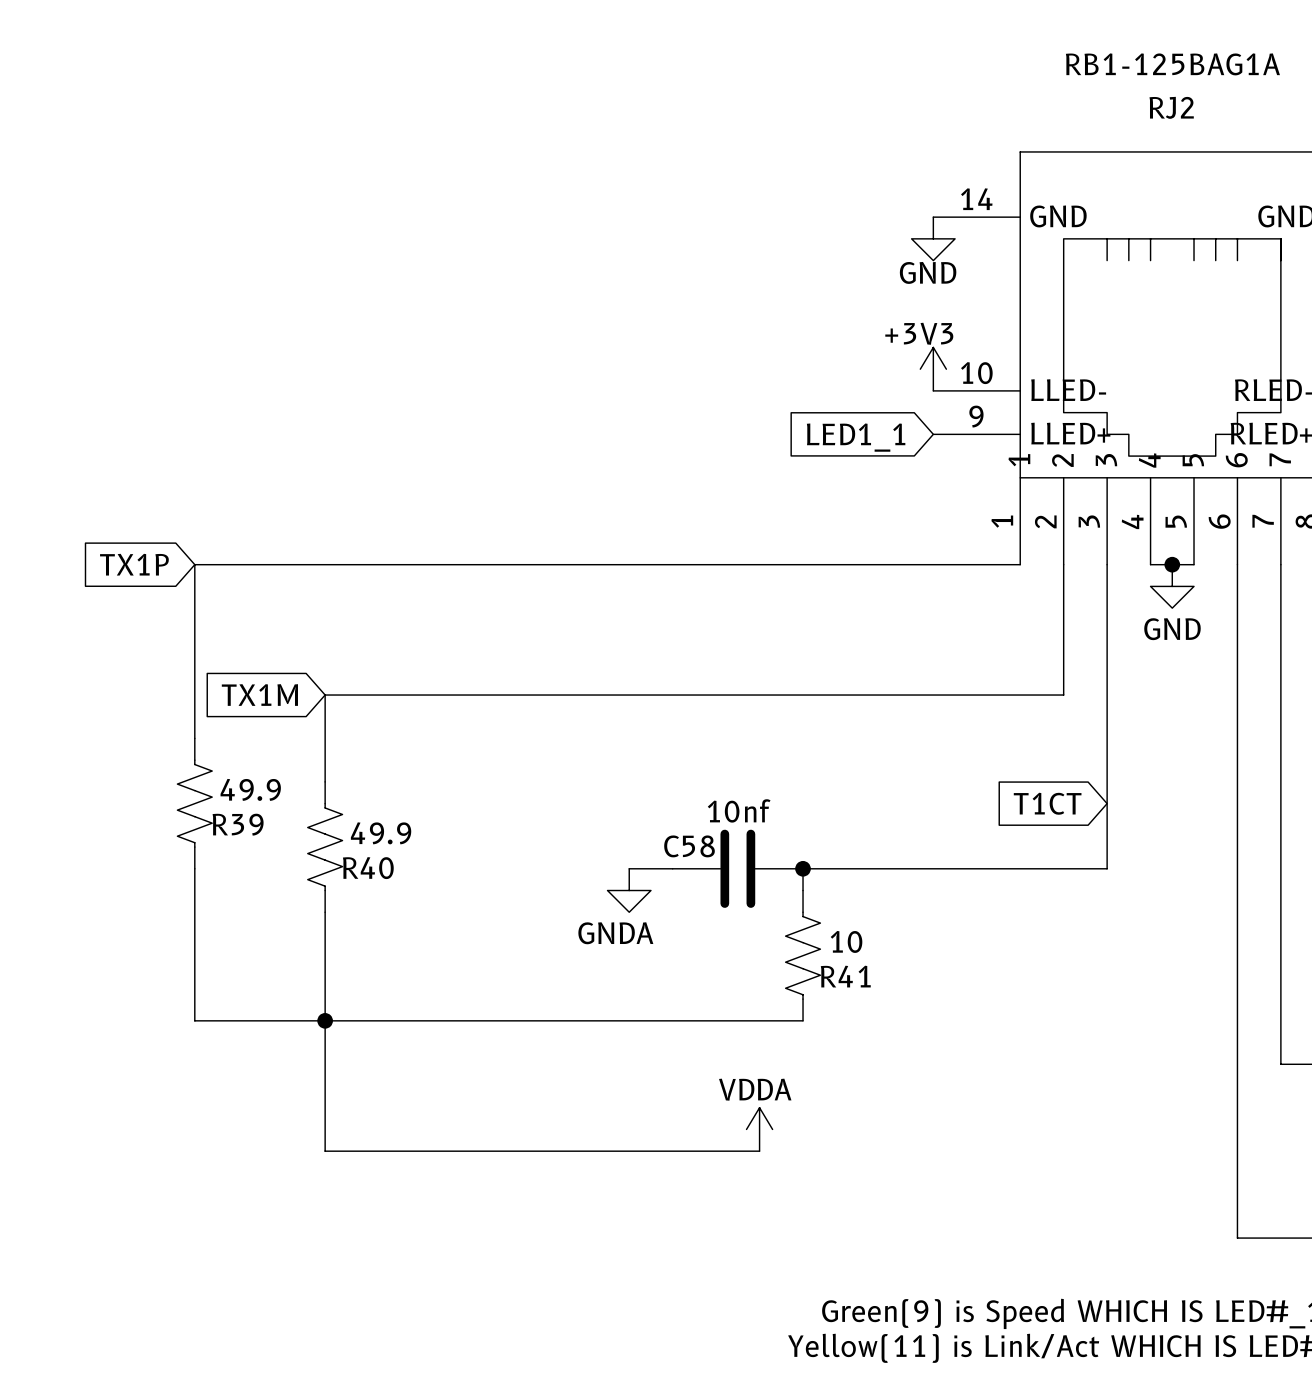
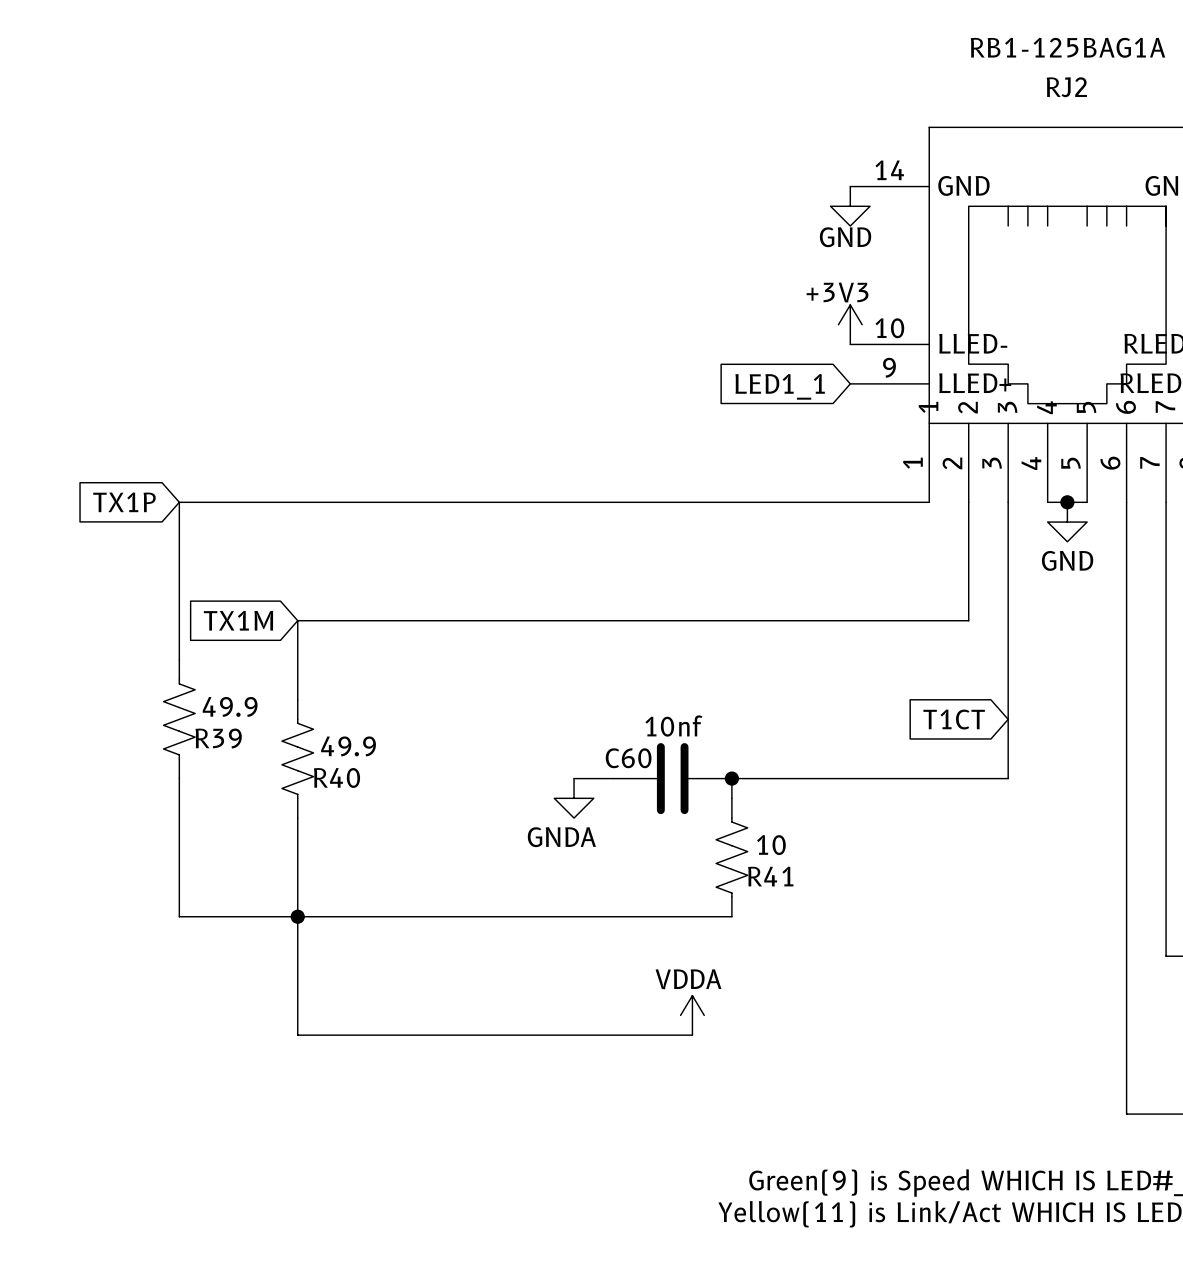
C58 name: C58 (689, 846) -> C60 (628, 758)

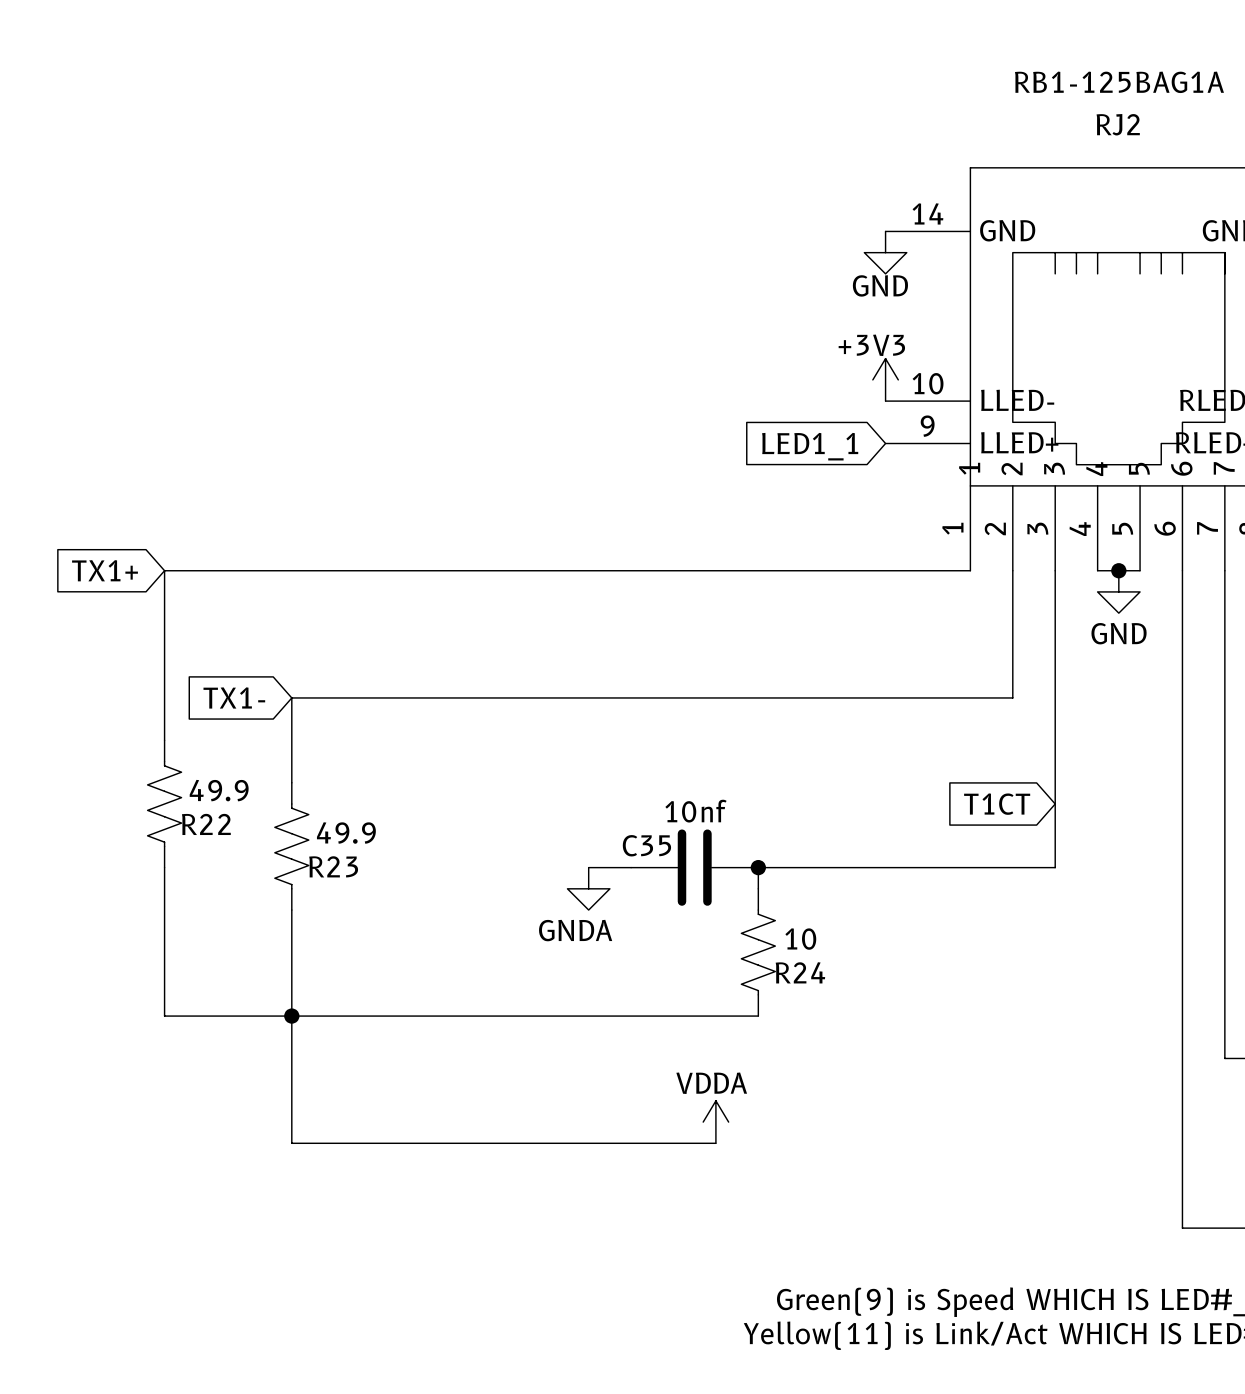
global label: TX1P (124, 502) -> TX1+ (105, 570)
global label: TX1M (238, 620) -> TX1- (234, 697)
R39 name: R39 (218, 738) -> R22 (206, 824)
C60 name: C60 (628, 758) -> C35 (646, 845)
R40 name: R40 (336, 777) -> R23 (333, 866)
R41 name: R41 (770, 876) -> R24 (800, 972)

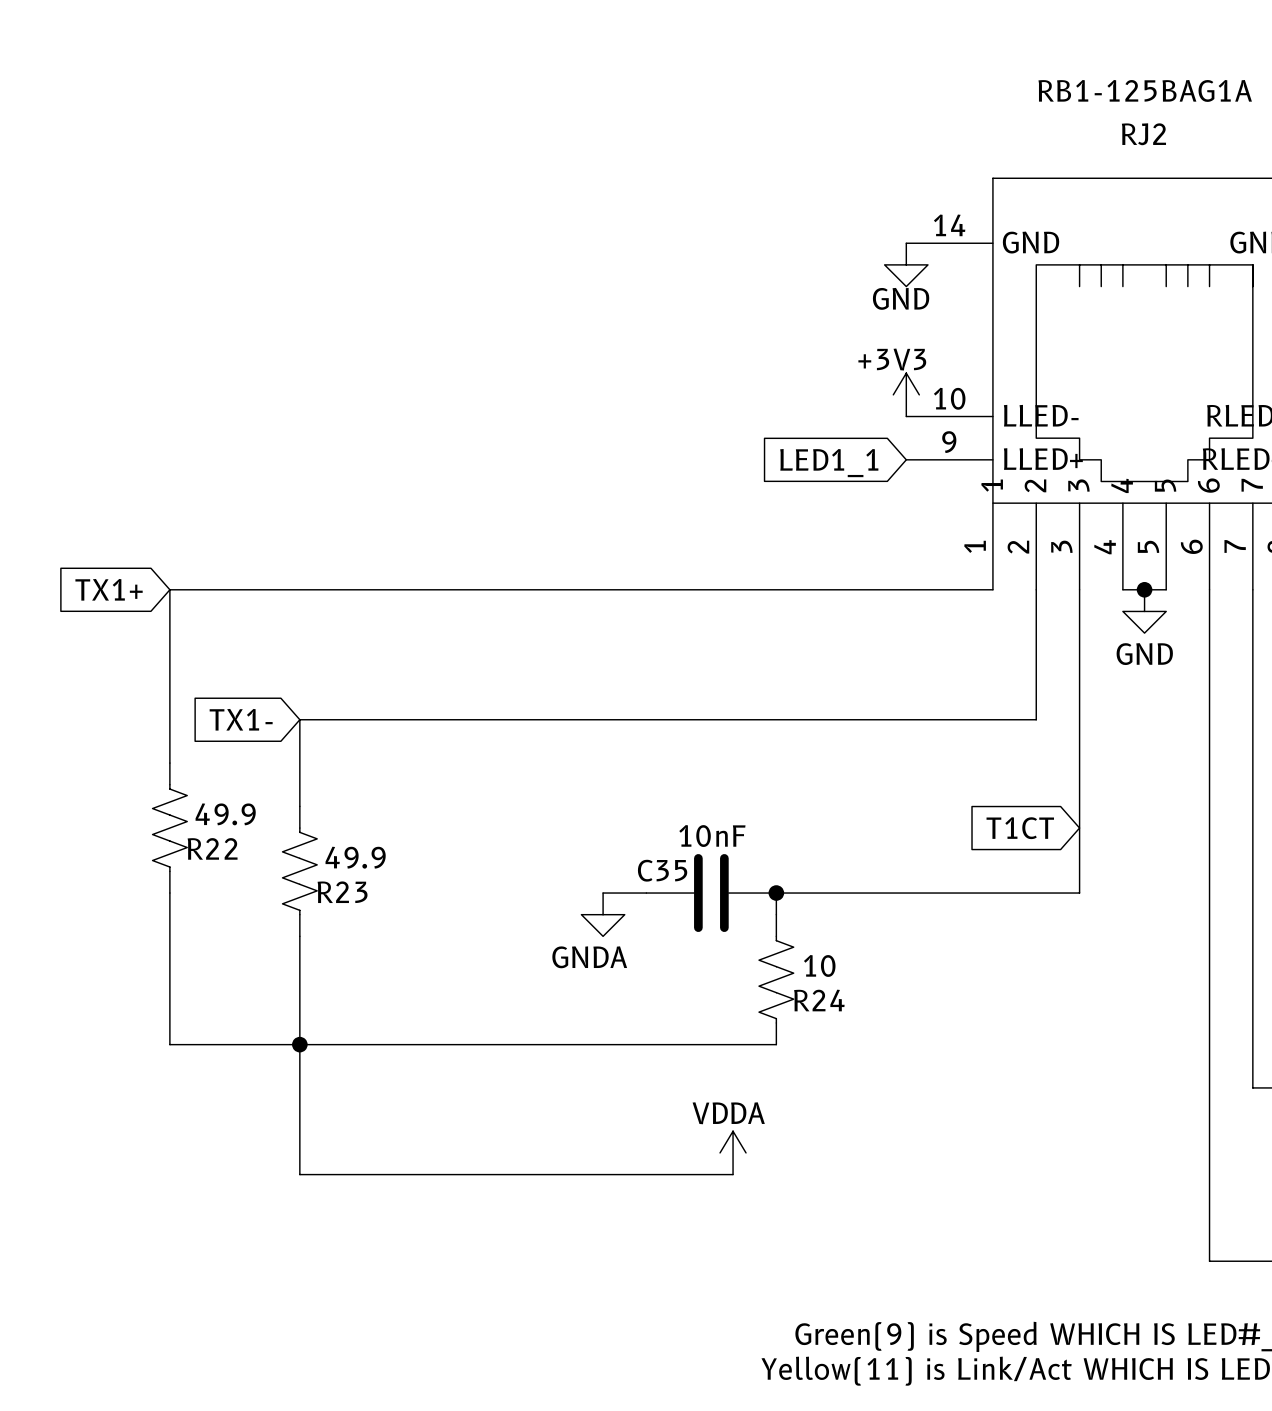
C35 value: 10nf (696, 811) -> 10nF (712, 836)

